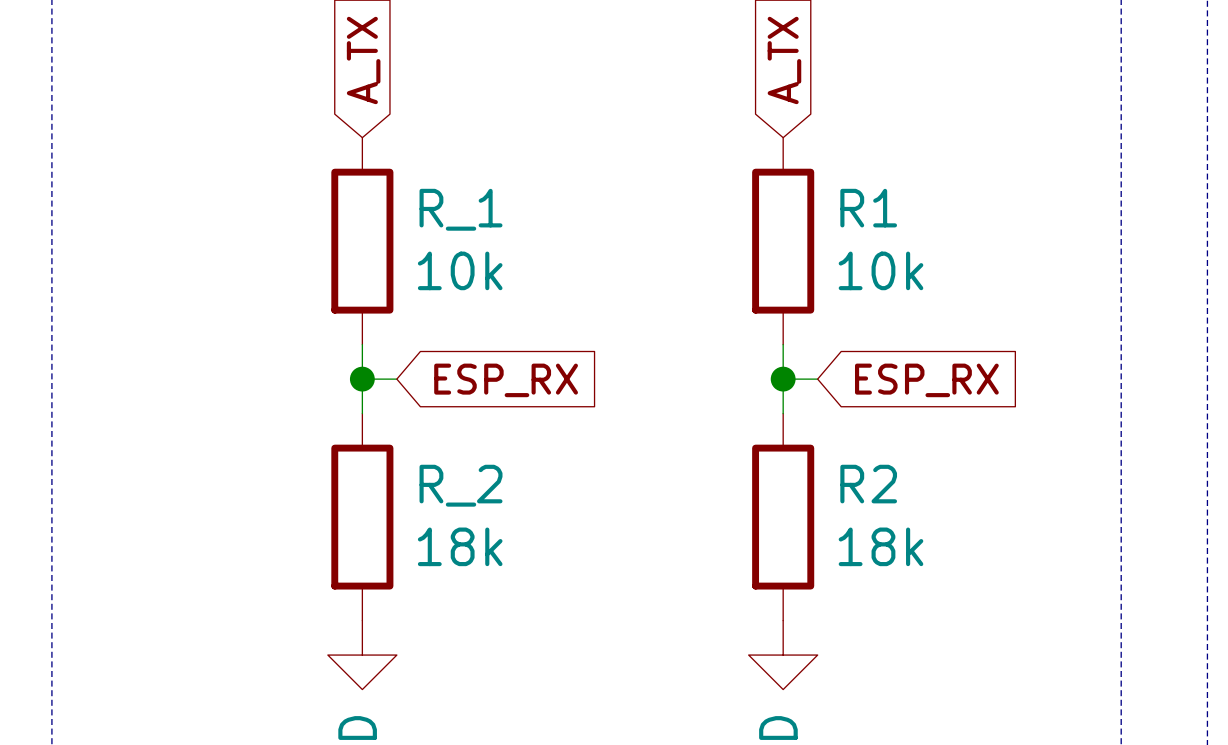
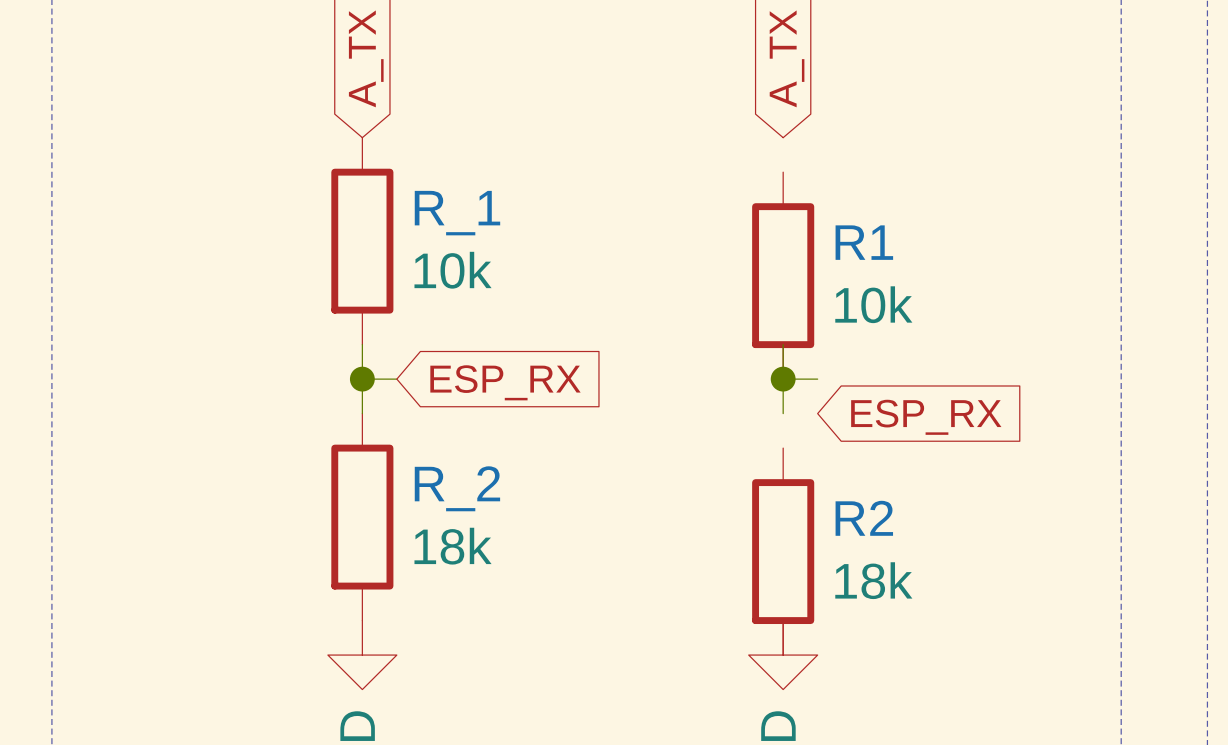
R1 position: (783, 241) -> (783, 275)
global label position: ESP_RX (926, 380) -> ESP_RX (926, 417)
R2 position: (783, 517) -> (783, 551)

